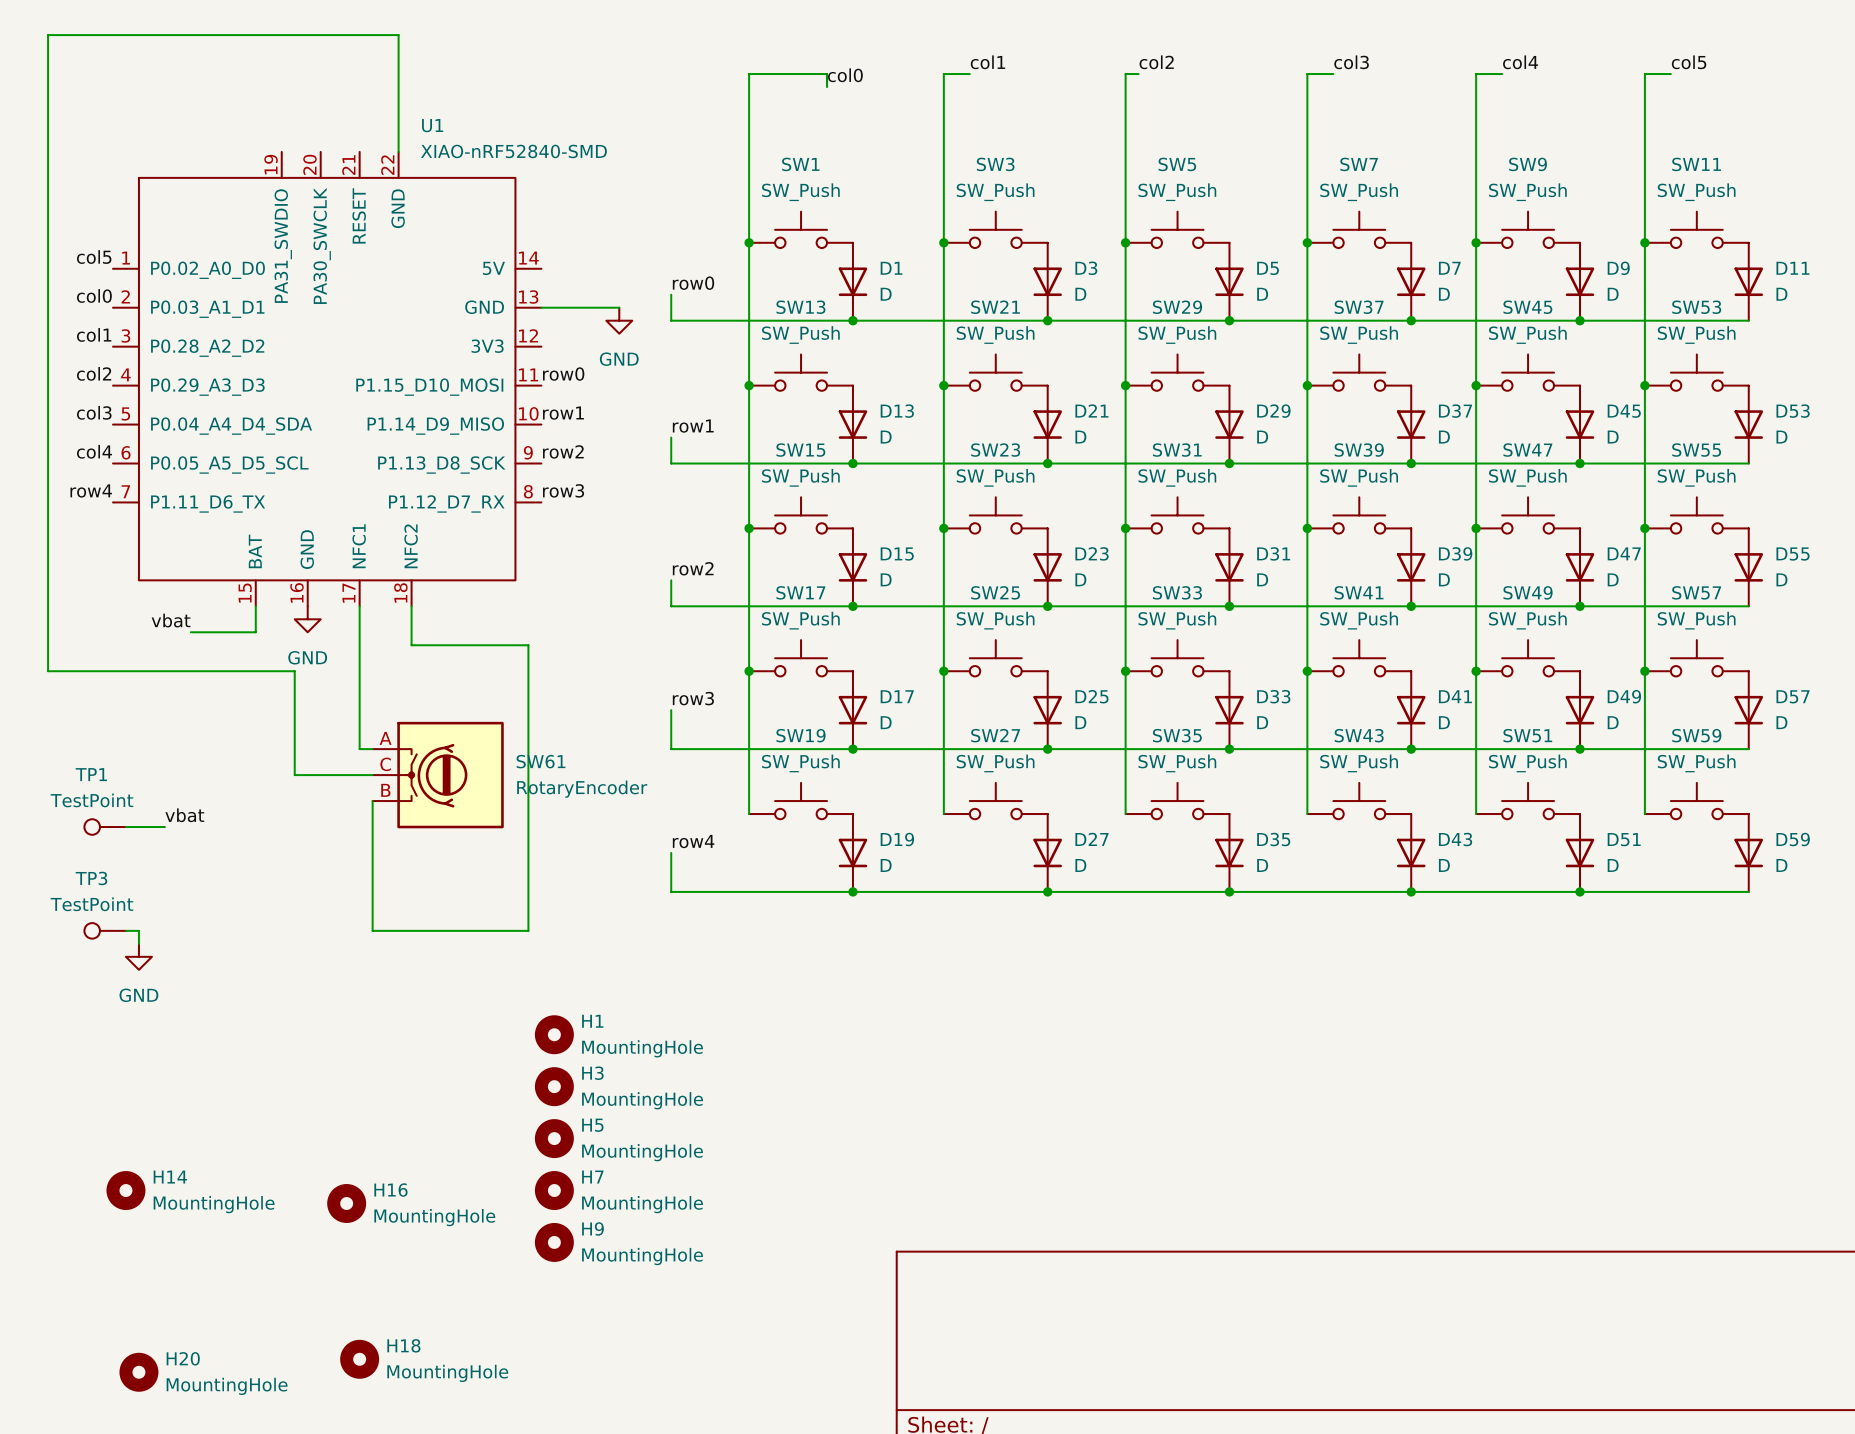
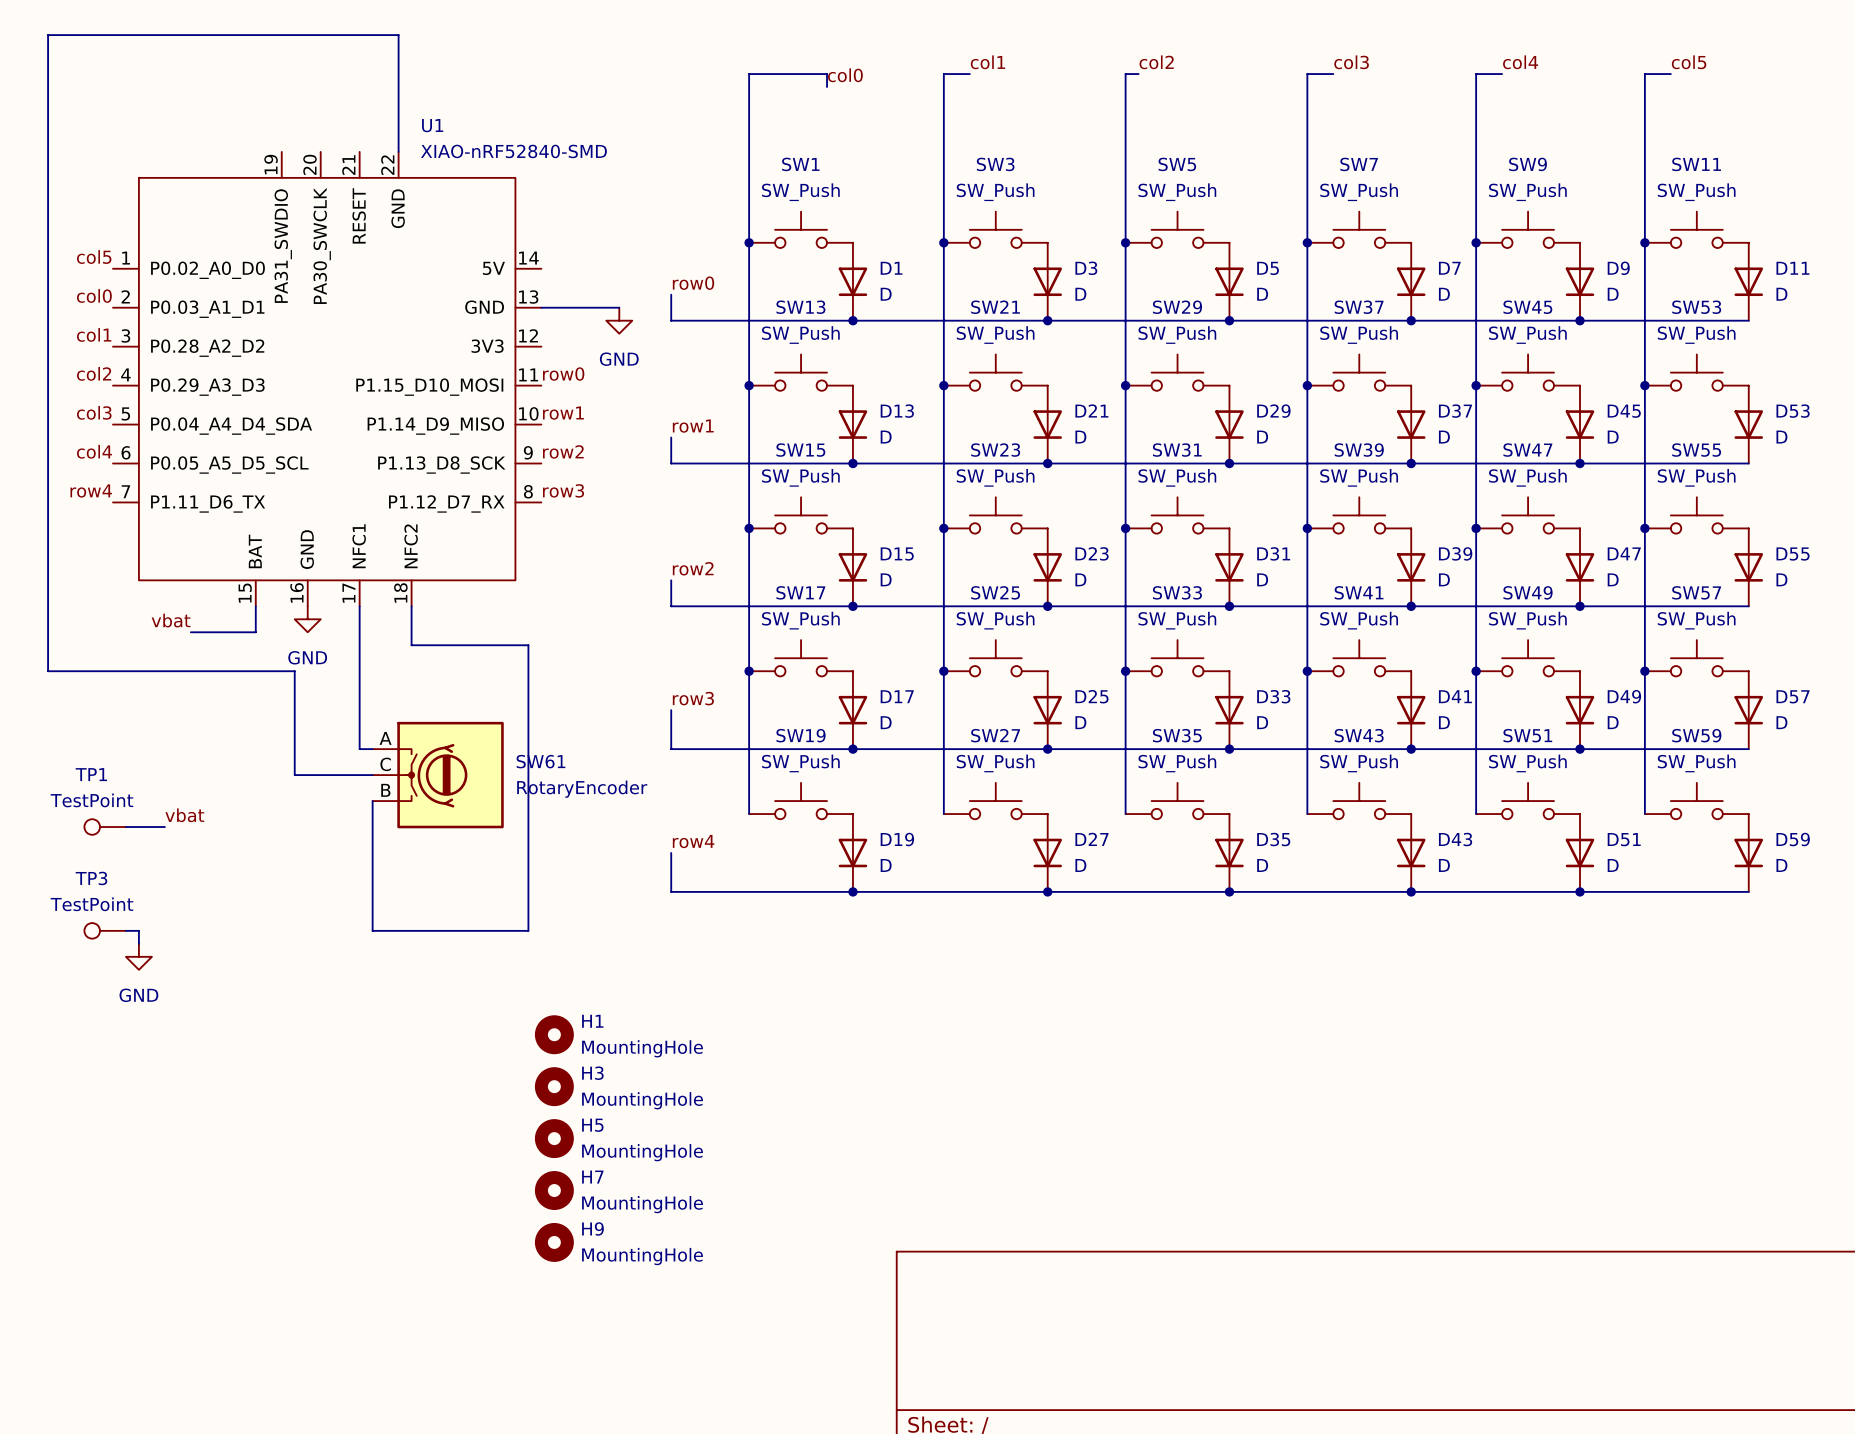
H14: MountingHole (125, 1190) -> none
H16: MountingHole (346, 1203) -> none
H18: MountingHole (359, 1359) -> none
H20: MountingHole (138, 1372) -> none

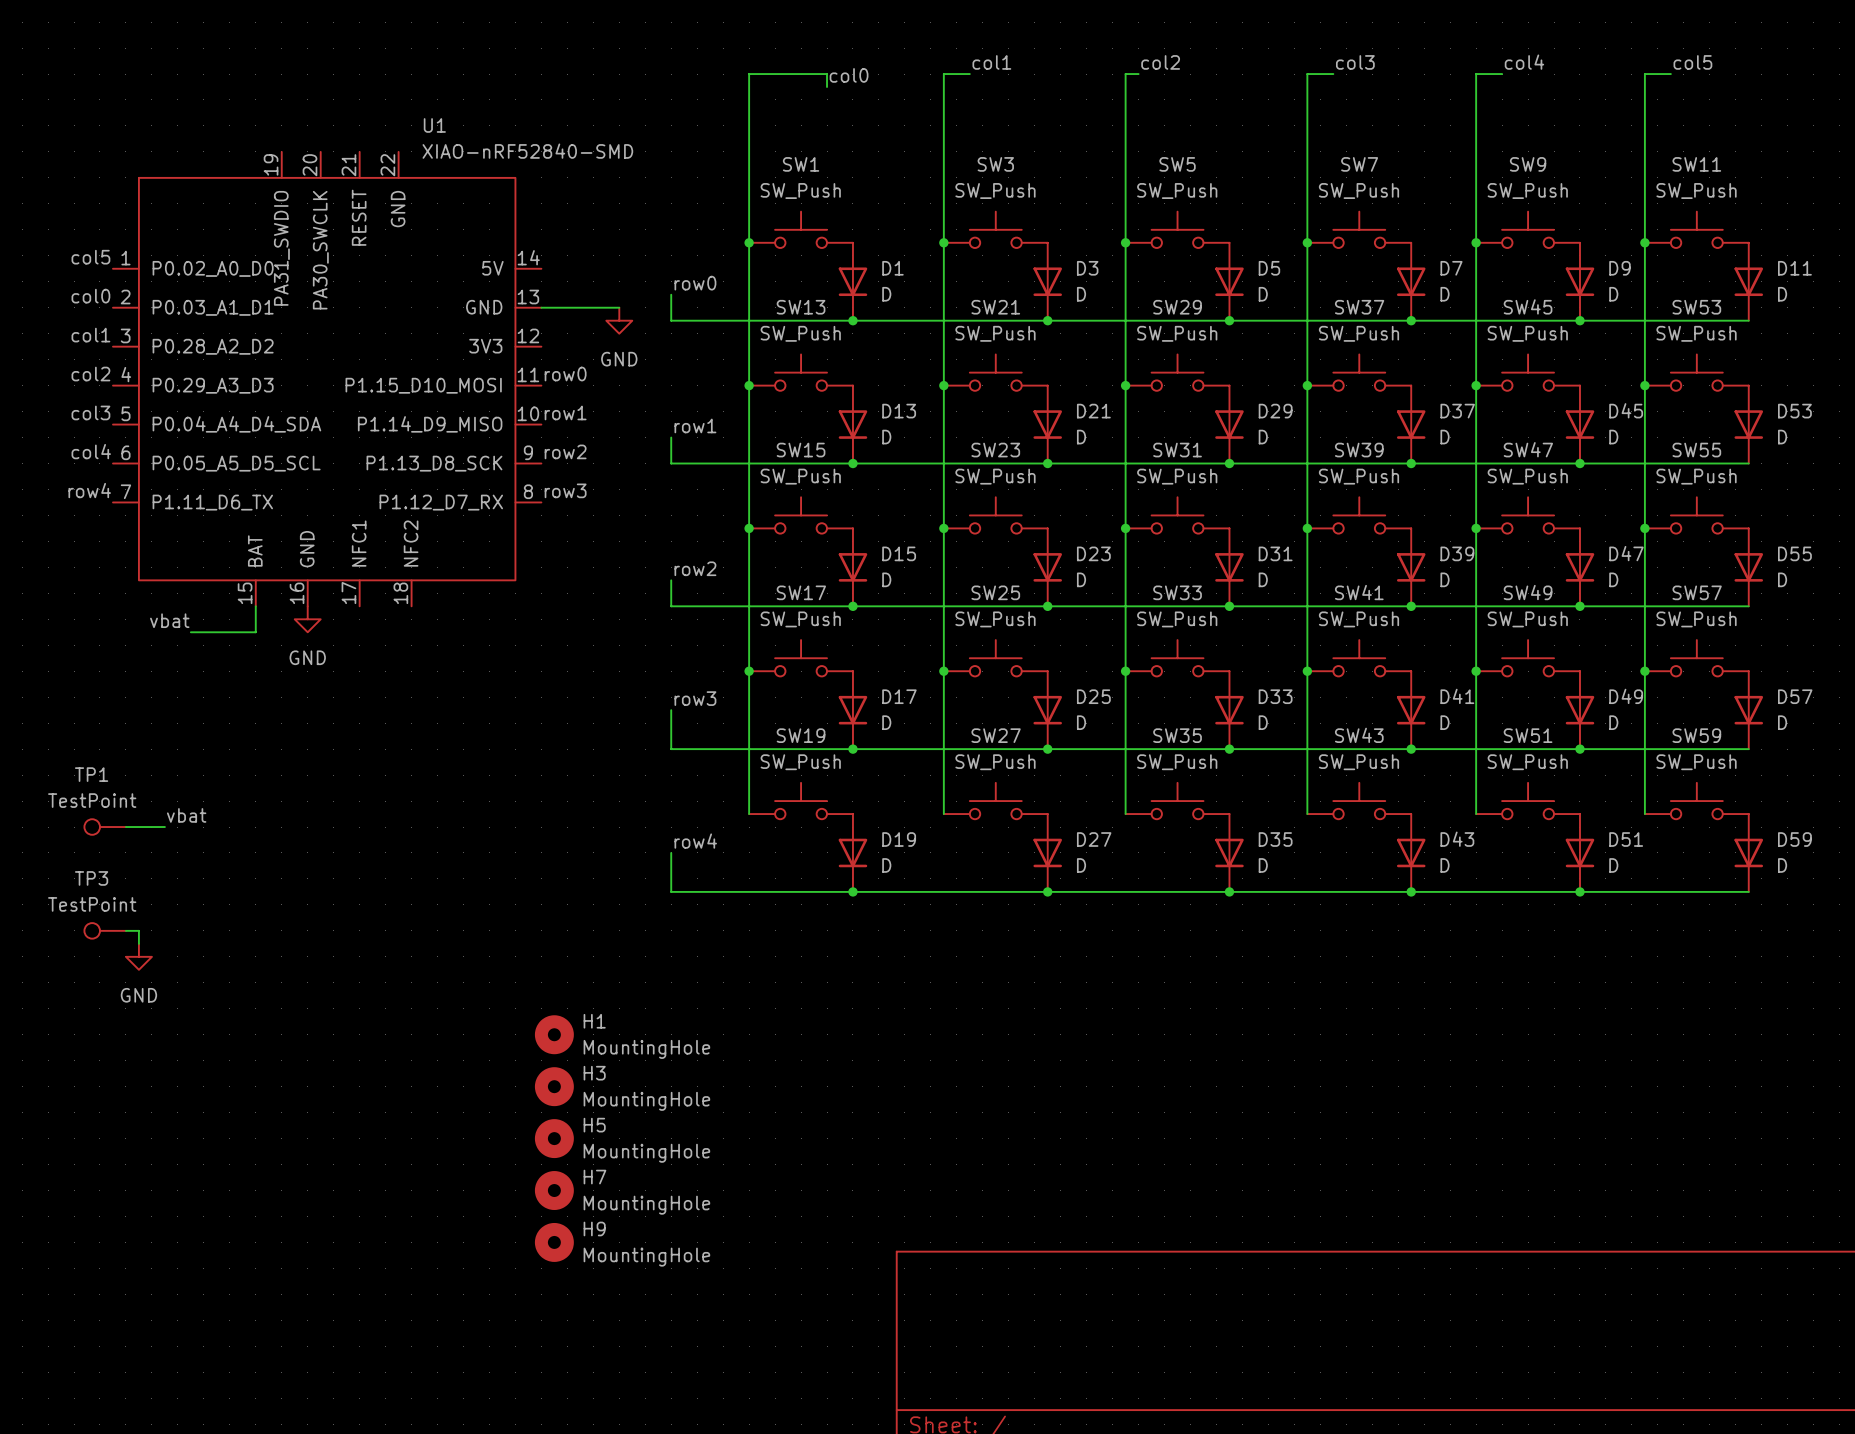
wire: (398, 151) (398, 35) (48, 35) (48, 671) (294, 671) (294, 775) (372, 775) -> none
wire: (359, 606) (359, 749) (372, 749) -> none
wire: (411, 606) (411, 645) (528, 645) (528, 930) (372, 930) (372, 801) -> none
SW61: RotaryEncoder (438, 775) -> none

